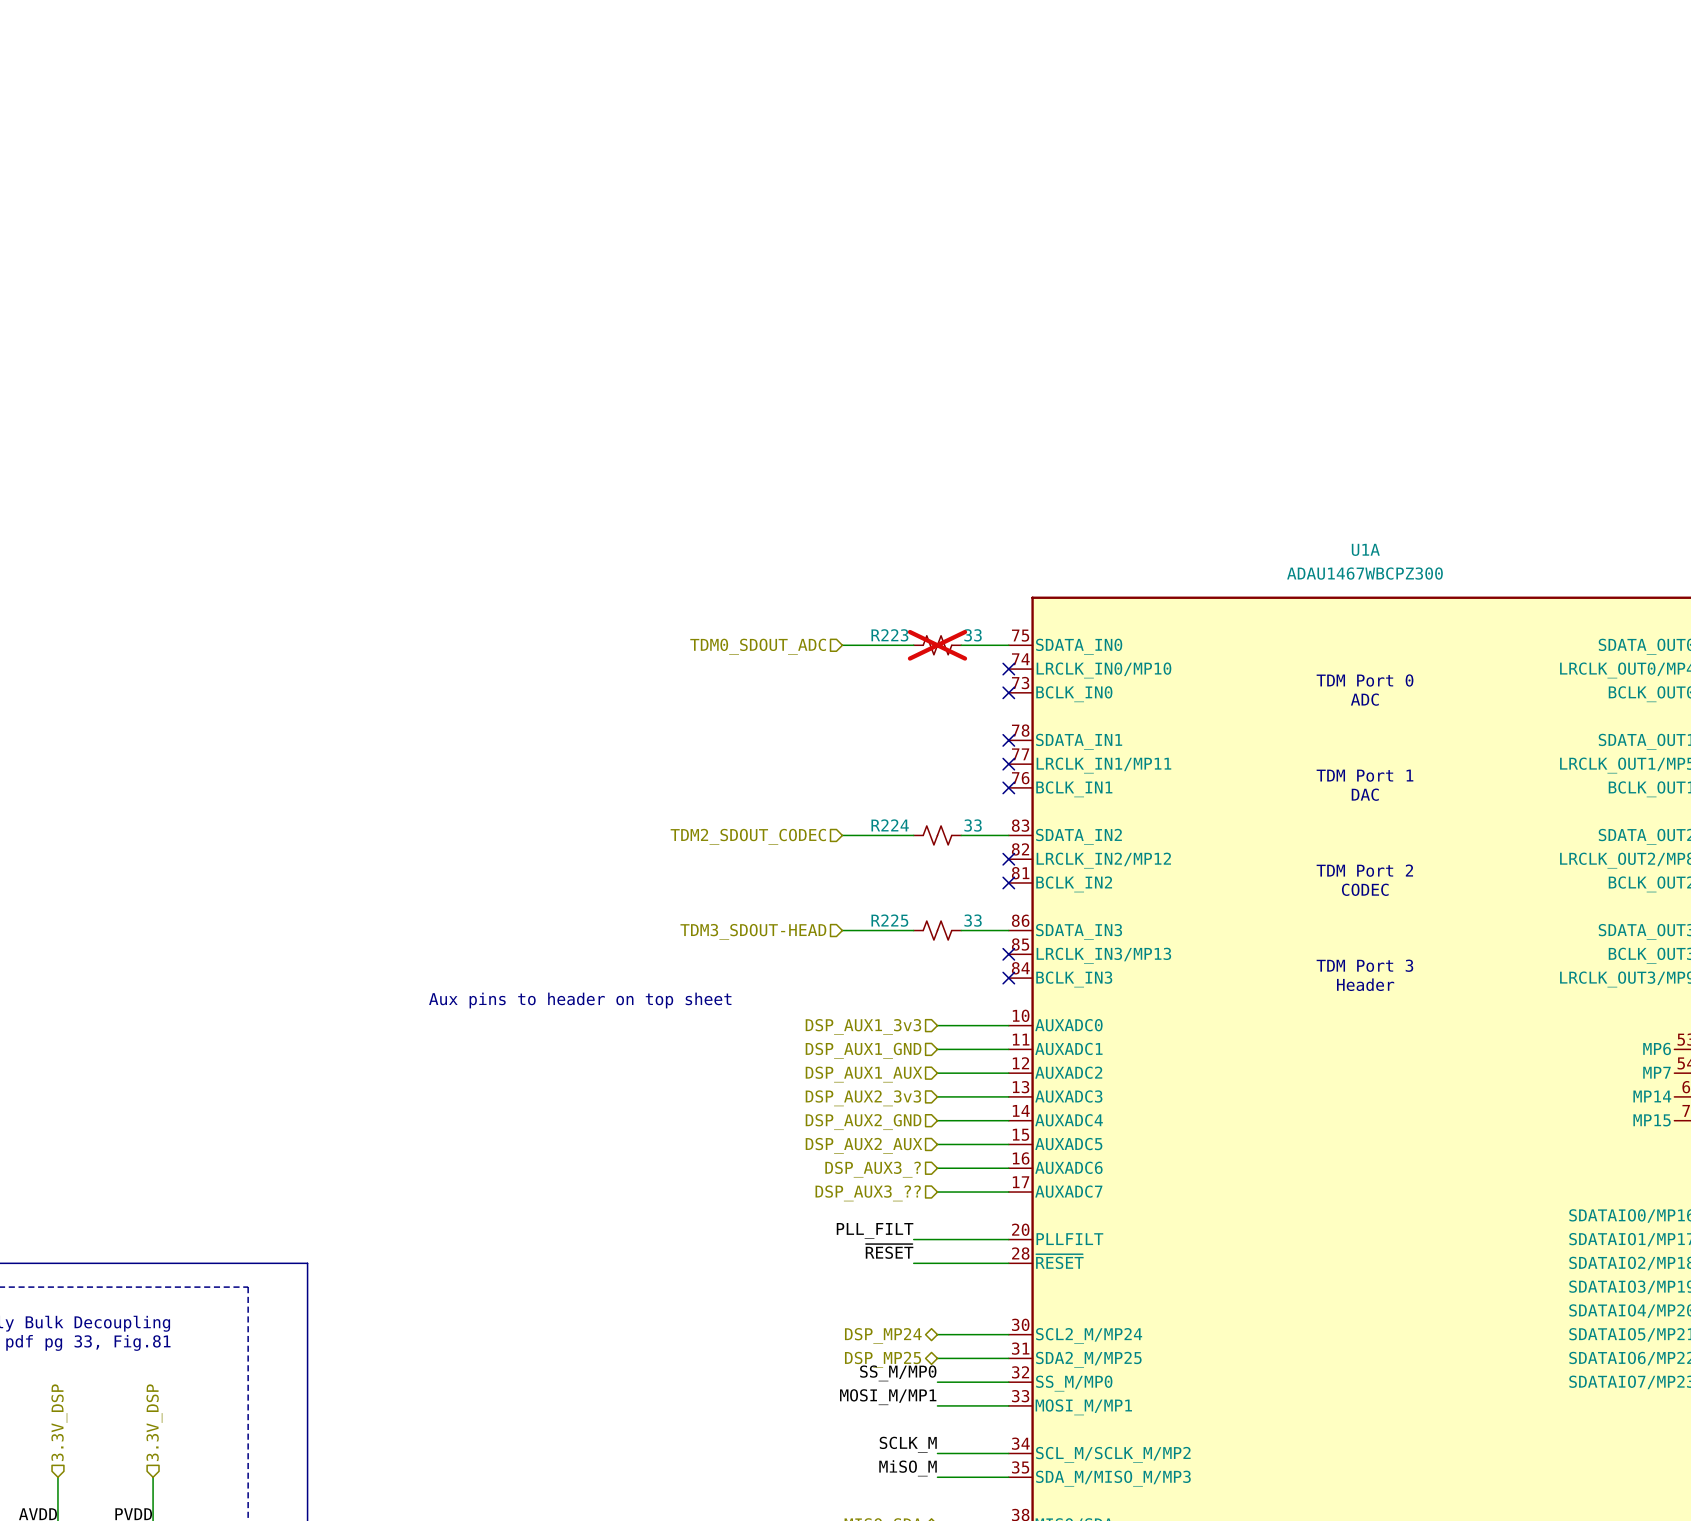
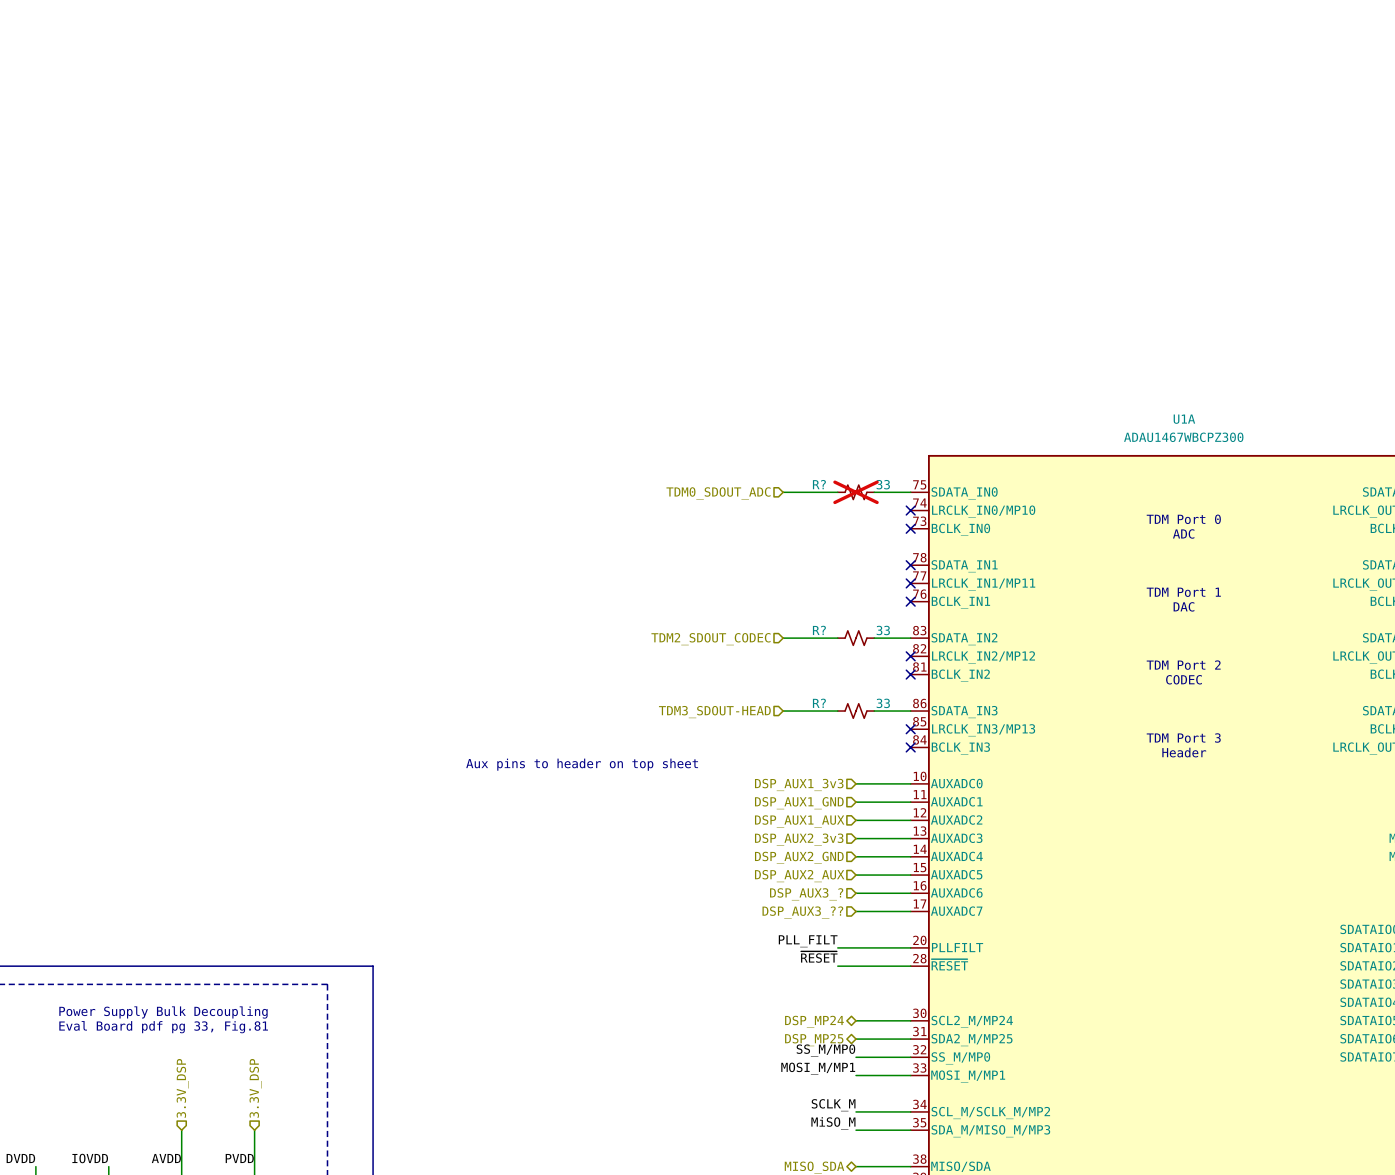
R223 name: R223 (889, 635) -> R? (819, 484)
R224 name: R224 (890, 825) -> R? (819, 630)
R225 name: R225 (889, 920) -> R? (819, 703)

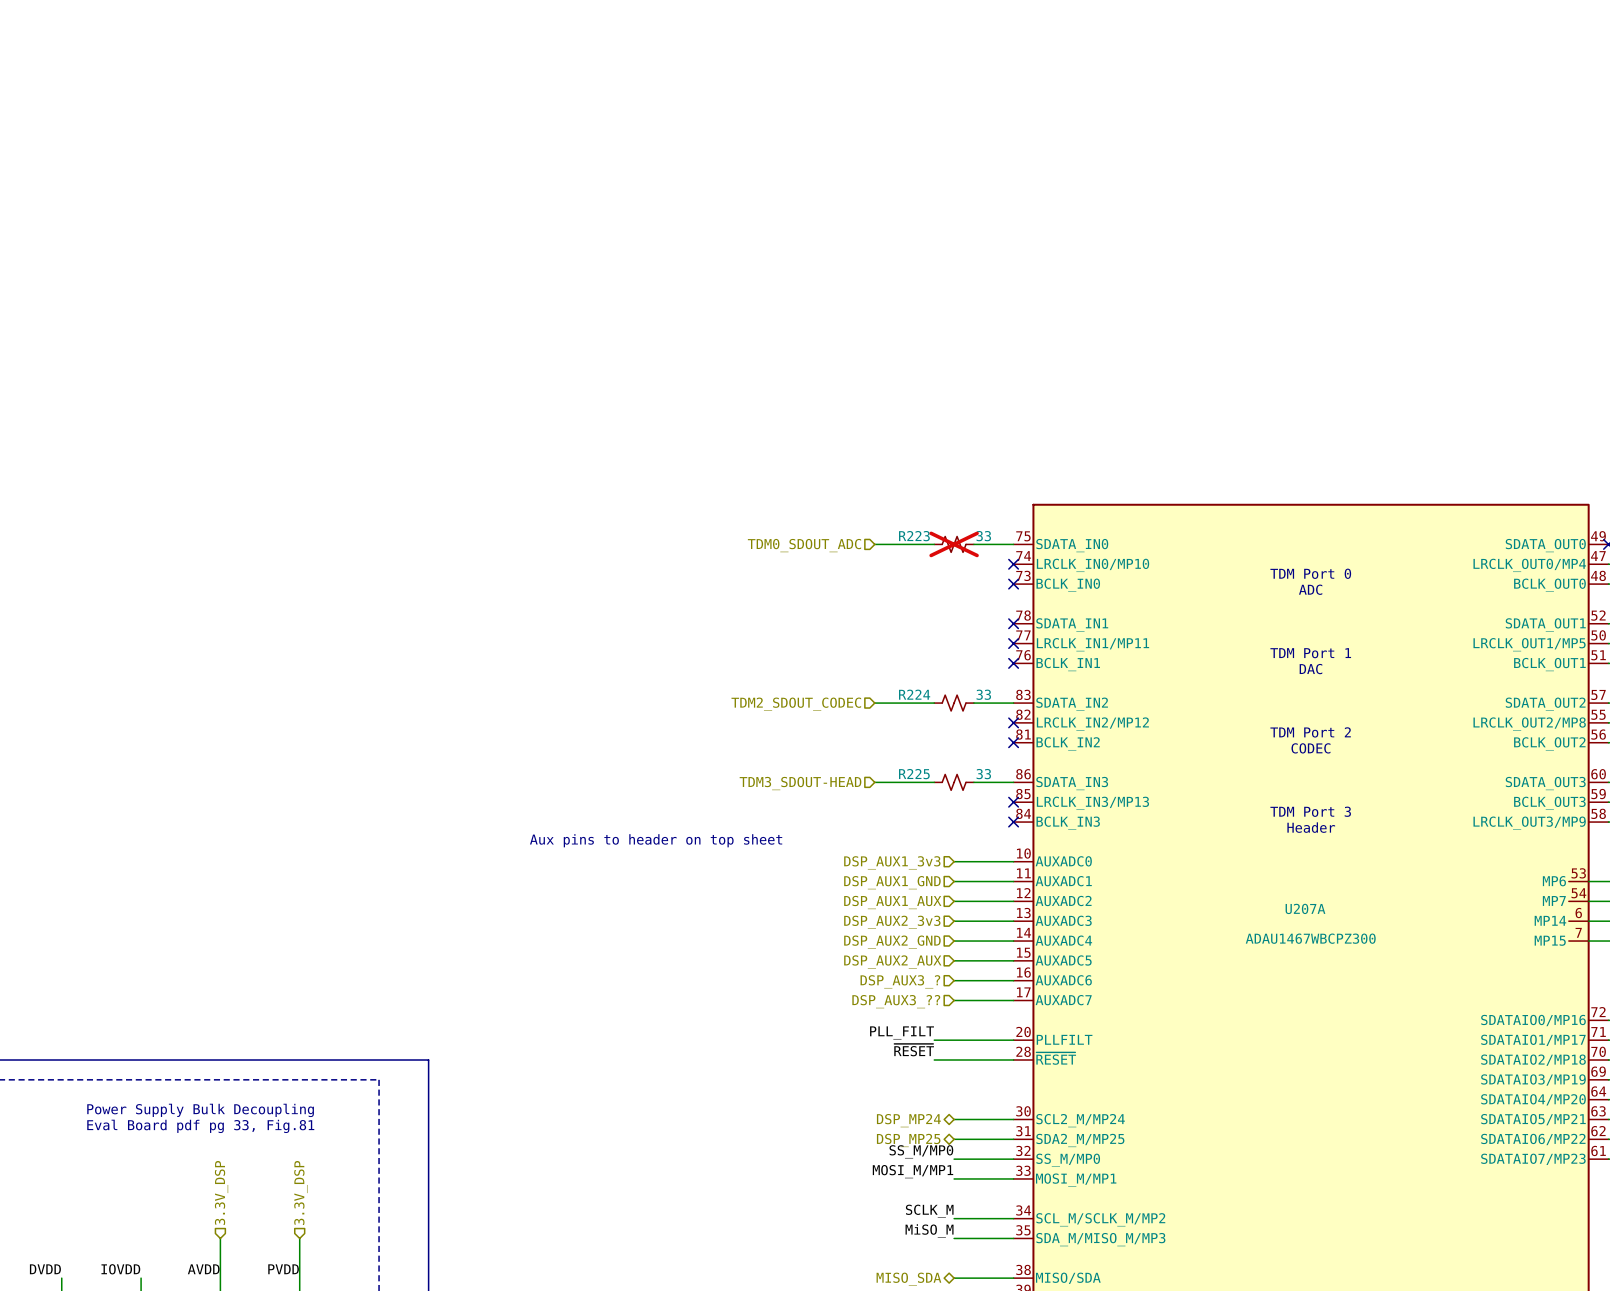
U1A name: U1A (1184, 419) -> U207A (1305, 908)
U1A value position: ADAU1467WBCPZ300 (1183, 437) -> ADAU1467WBCPZ300 (1310, 938)
R? name: R? (819, 484) -> R223 (914, 536)
R? name: R? (819, 630) -> R224 (914, 694)
R? name: R? (819, 703) -> R225 (914, 774)

